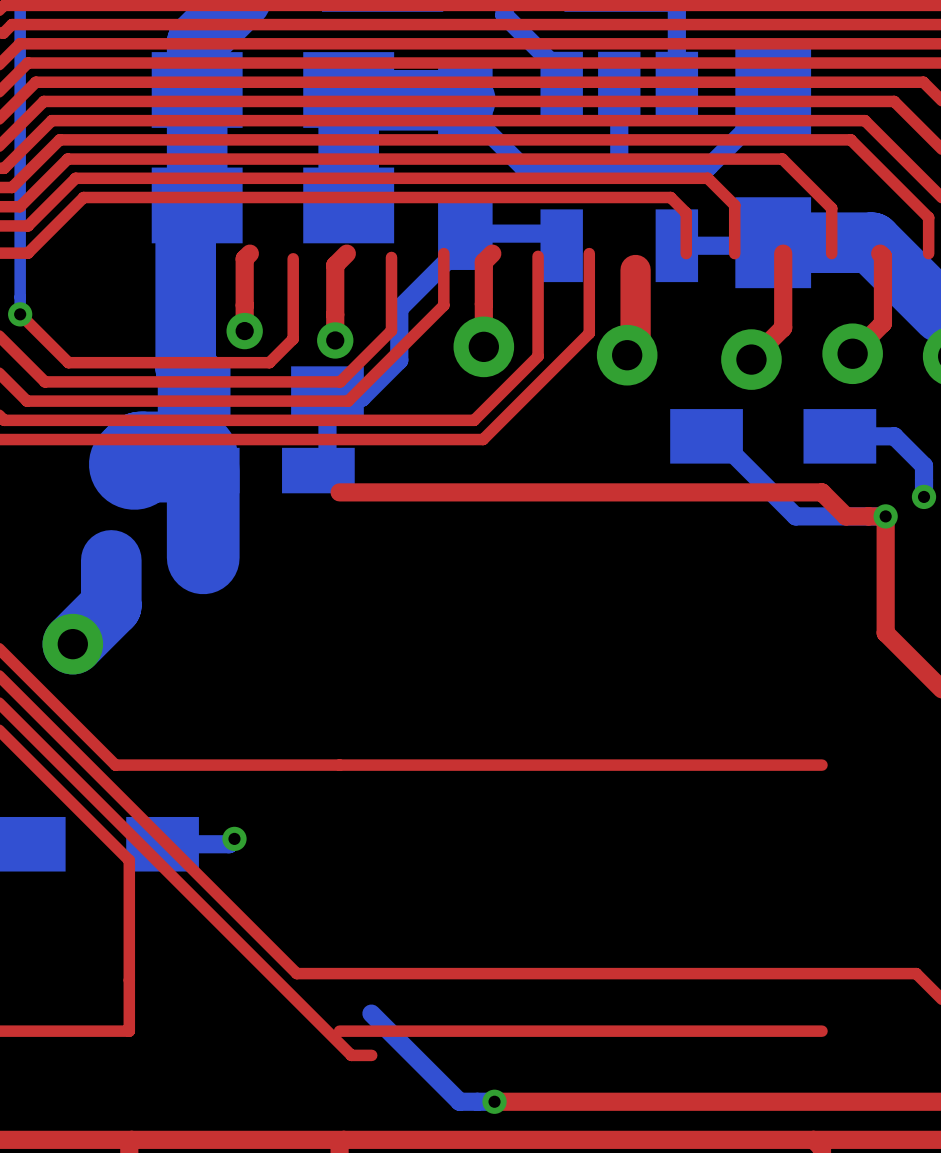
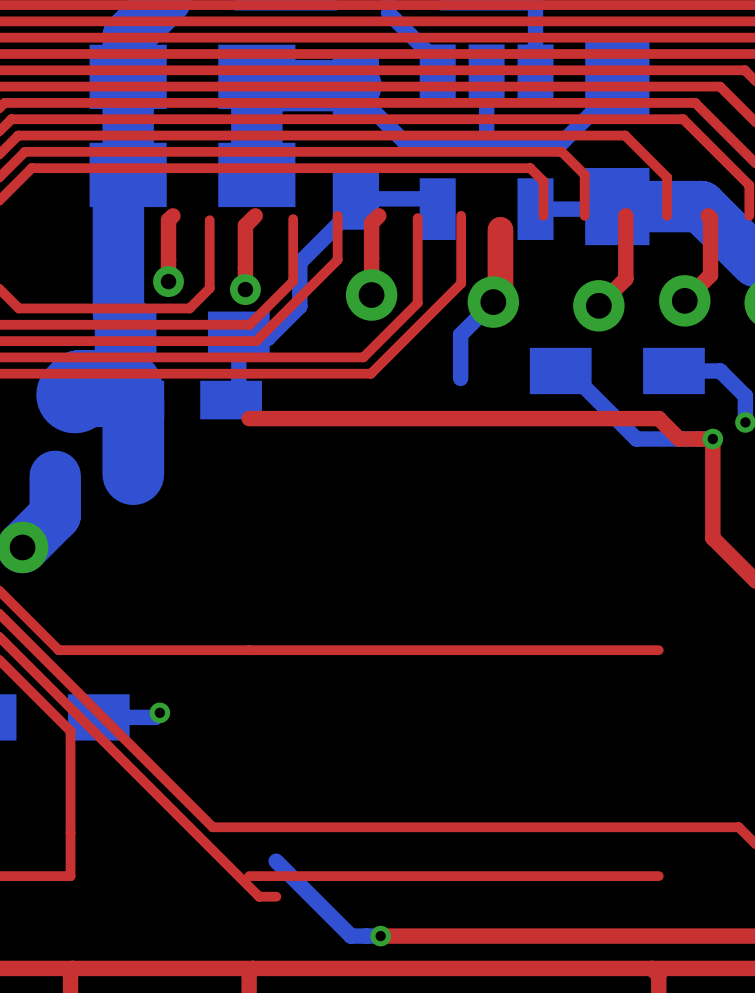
bottom track: none -> (493, 302) (460, 334) (460, 378)

